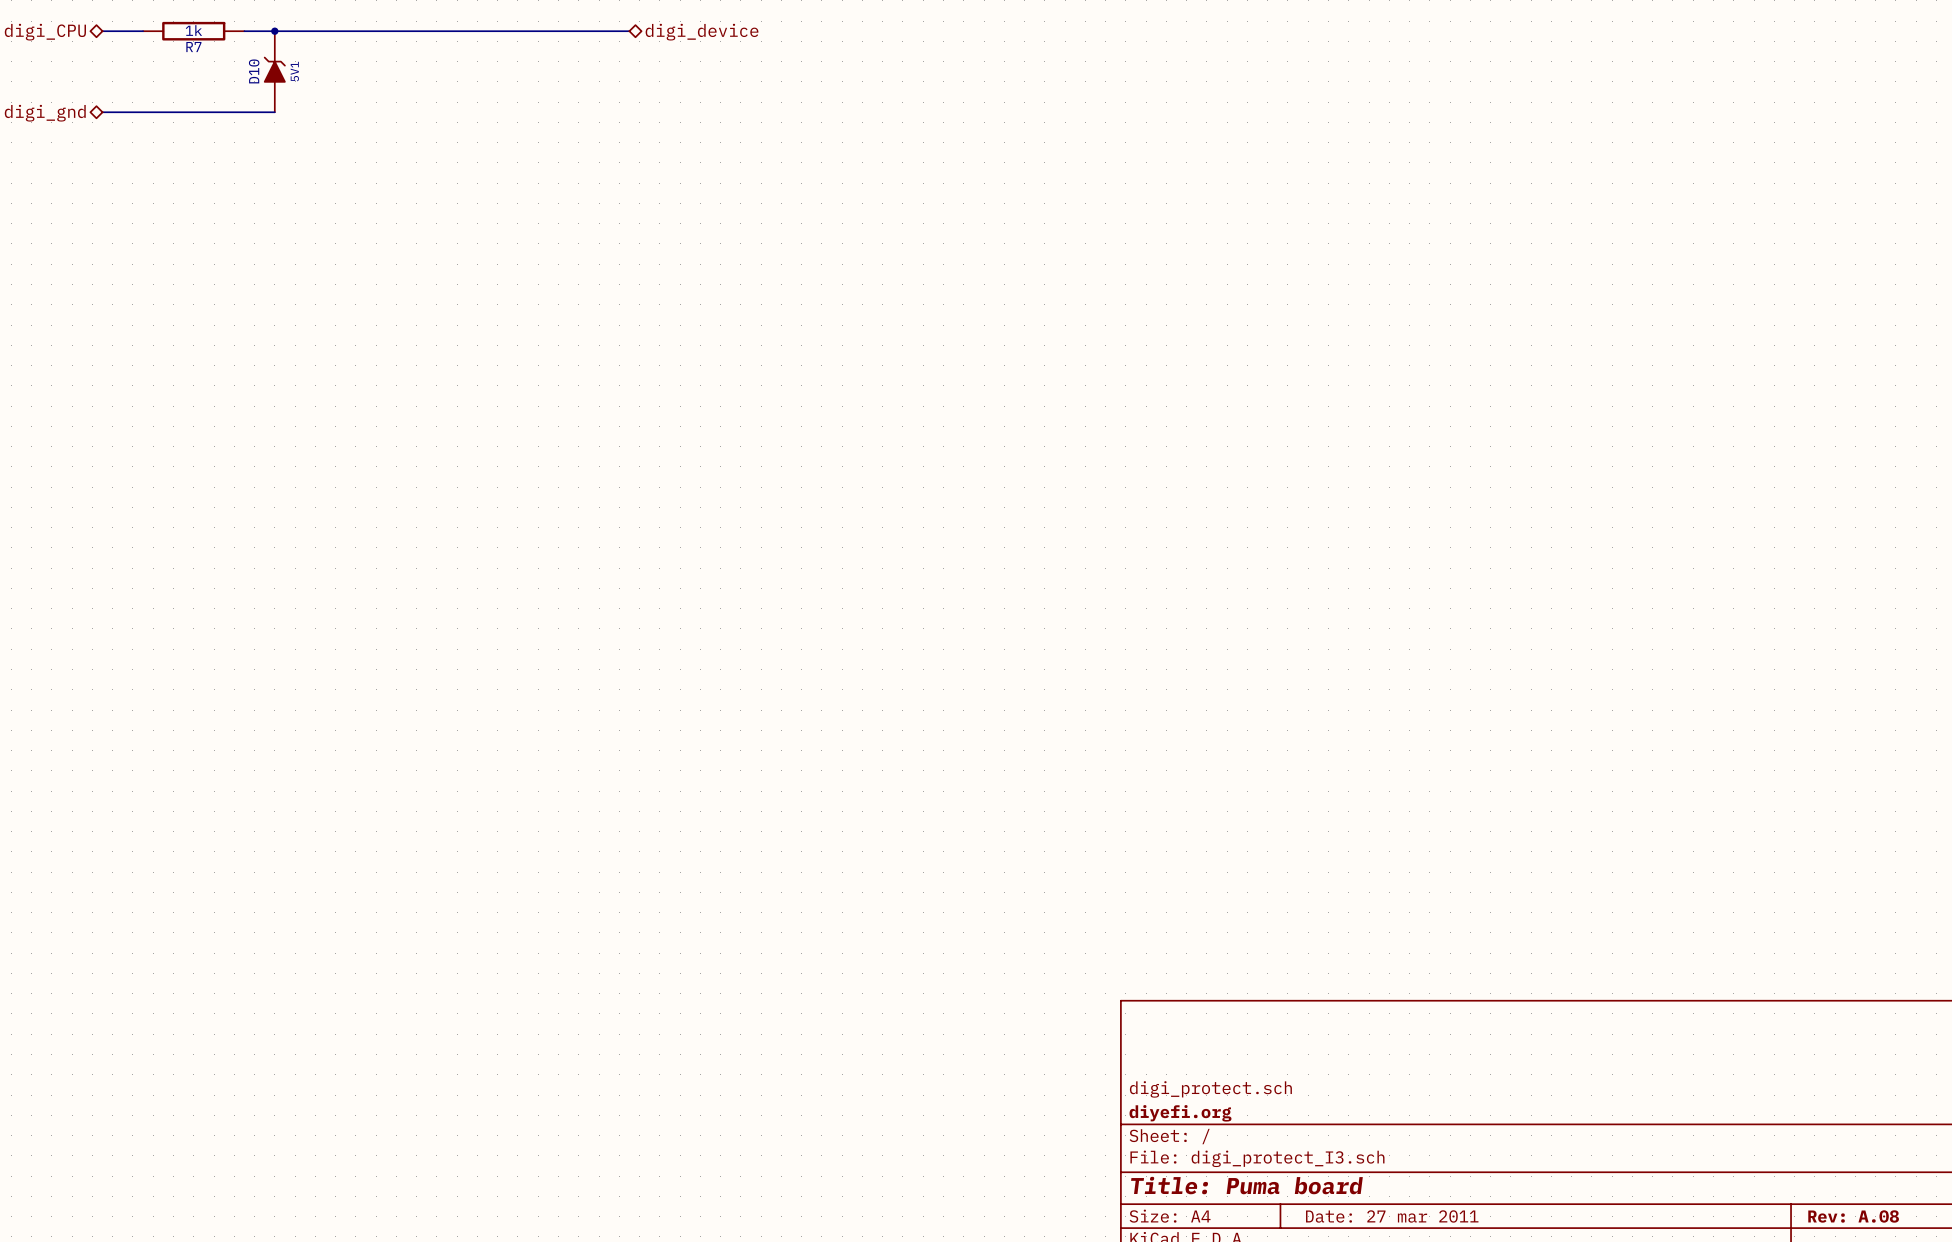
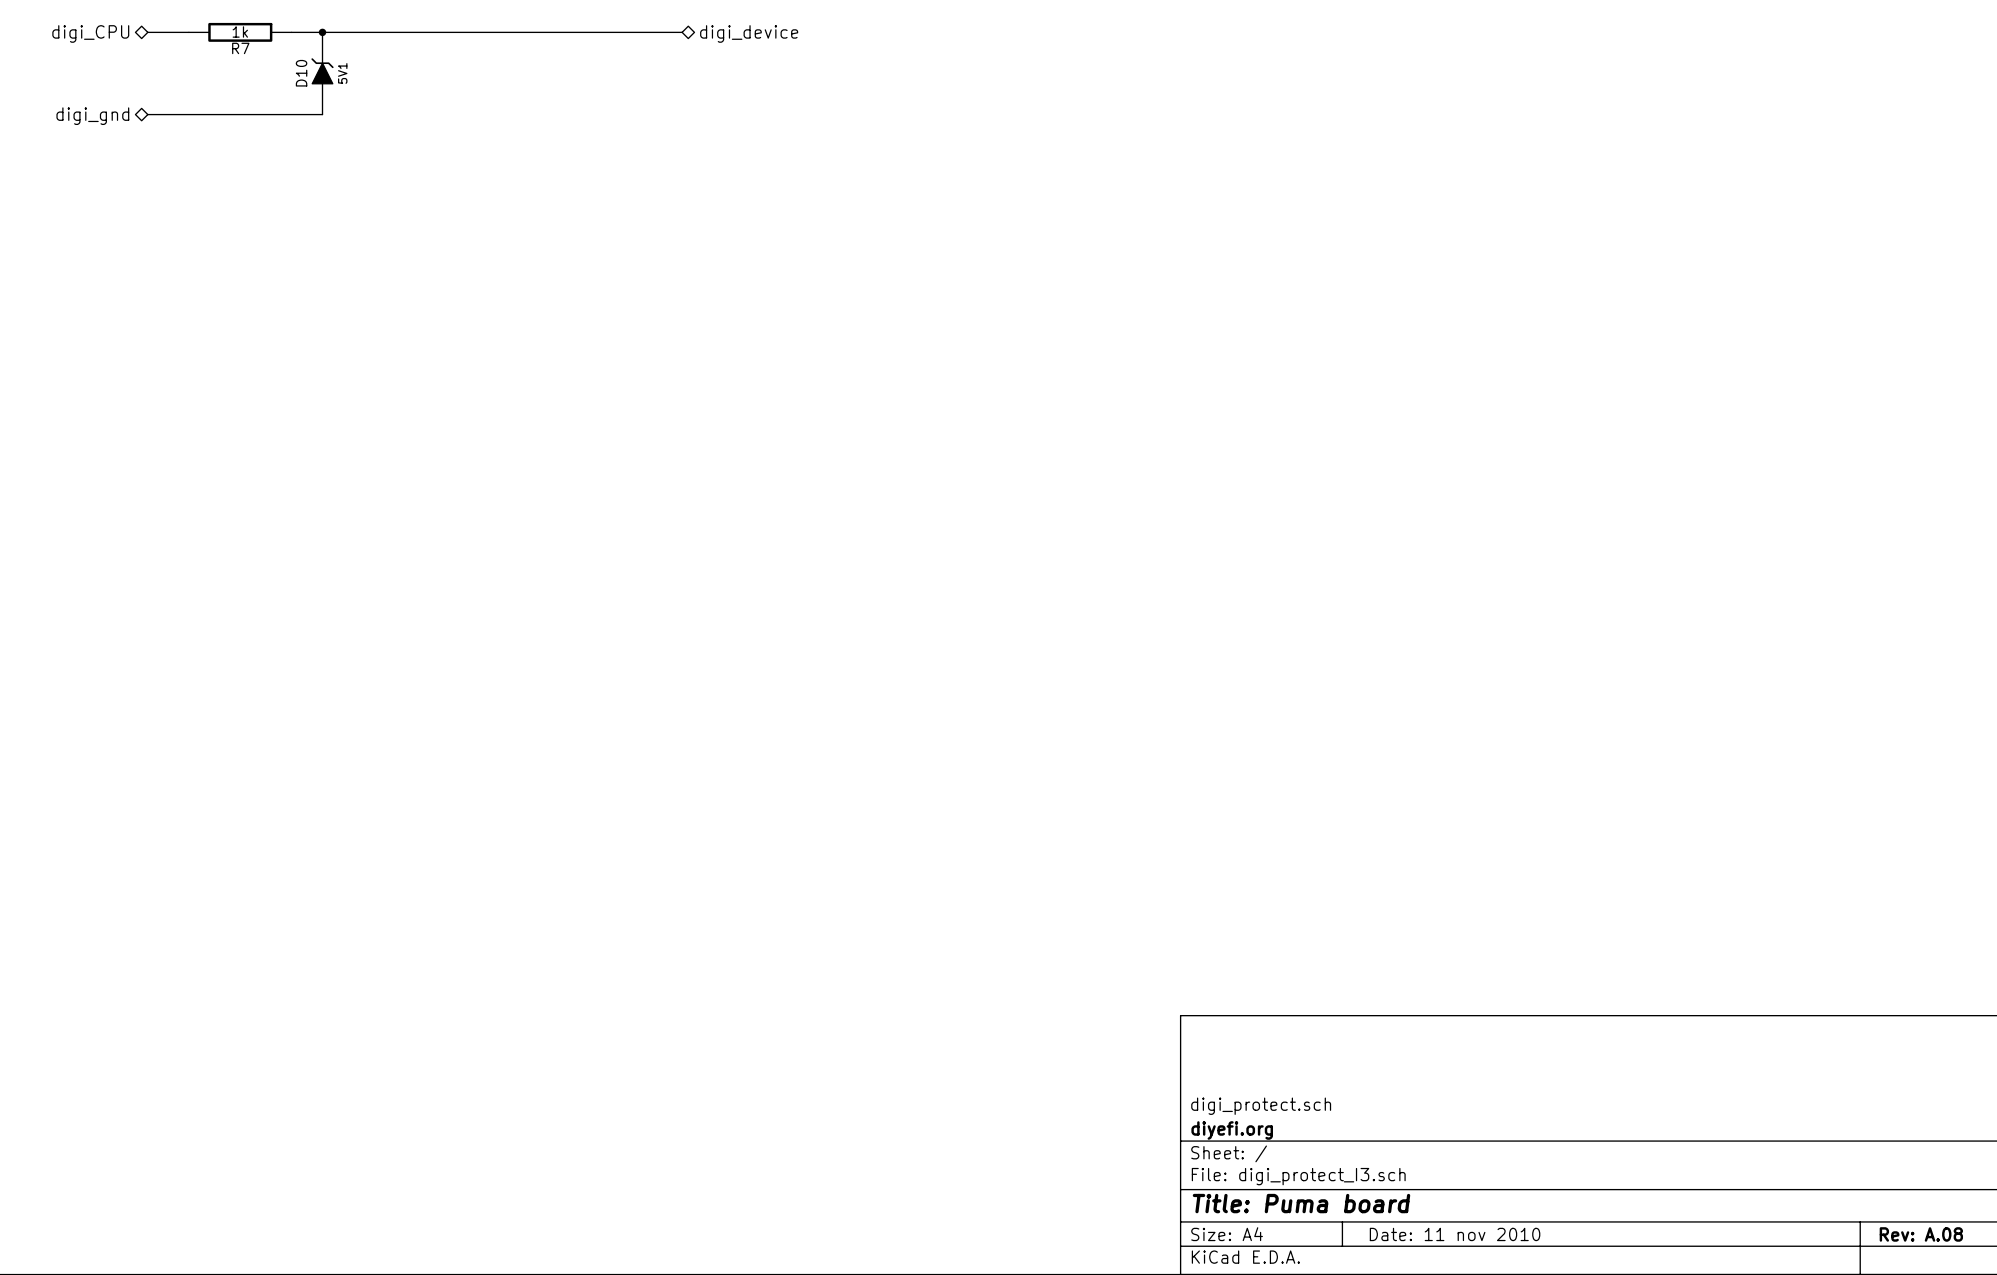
title block: Date: 27 mar 2011 (1392, 1216) -> Date: 11 nov 2010 (1455, 1234)

